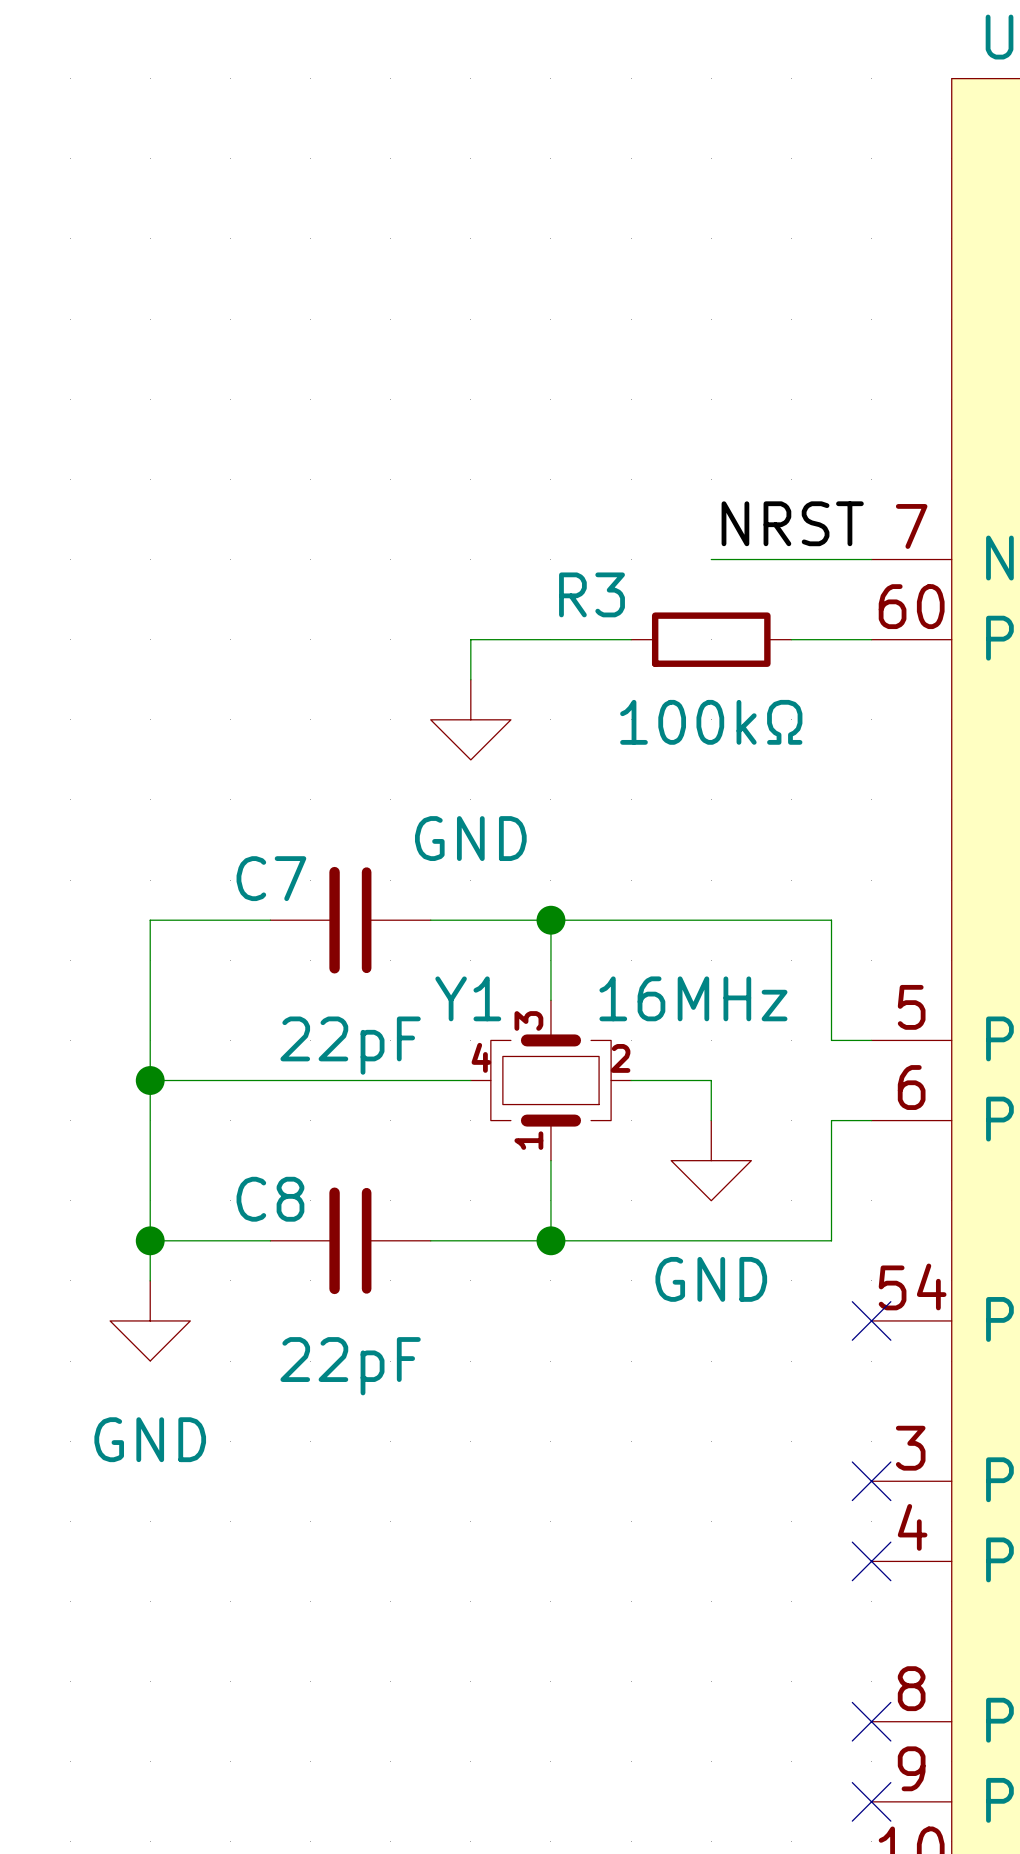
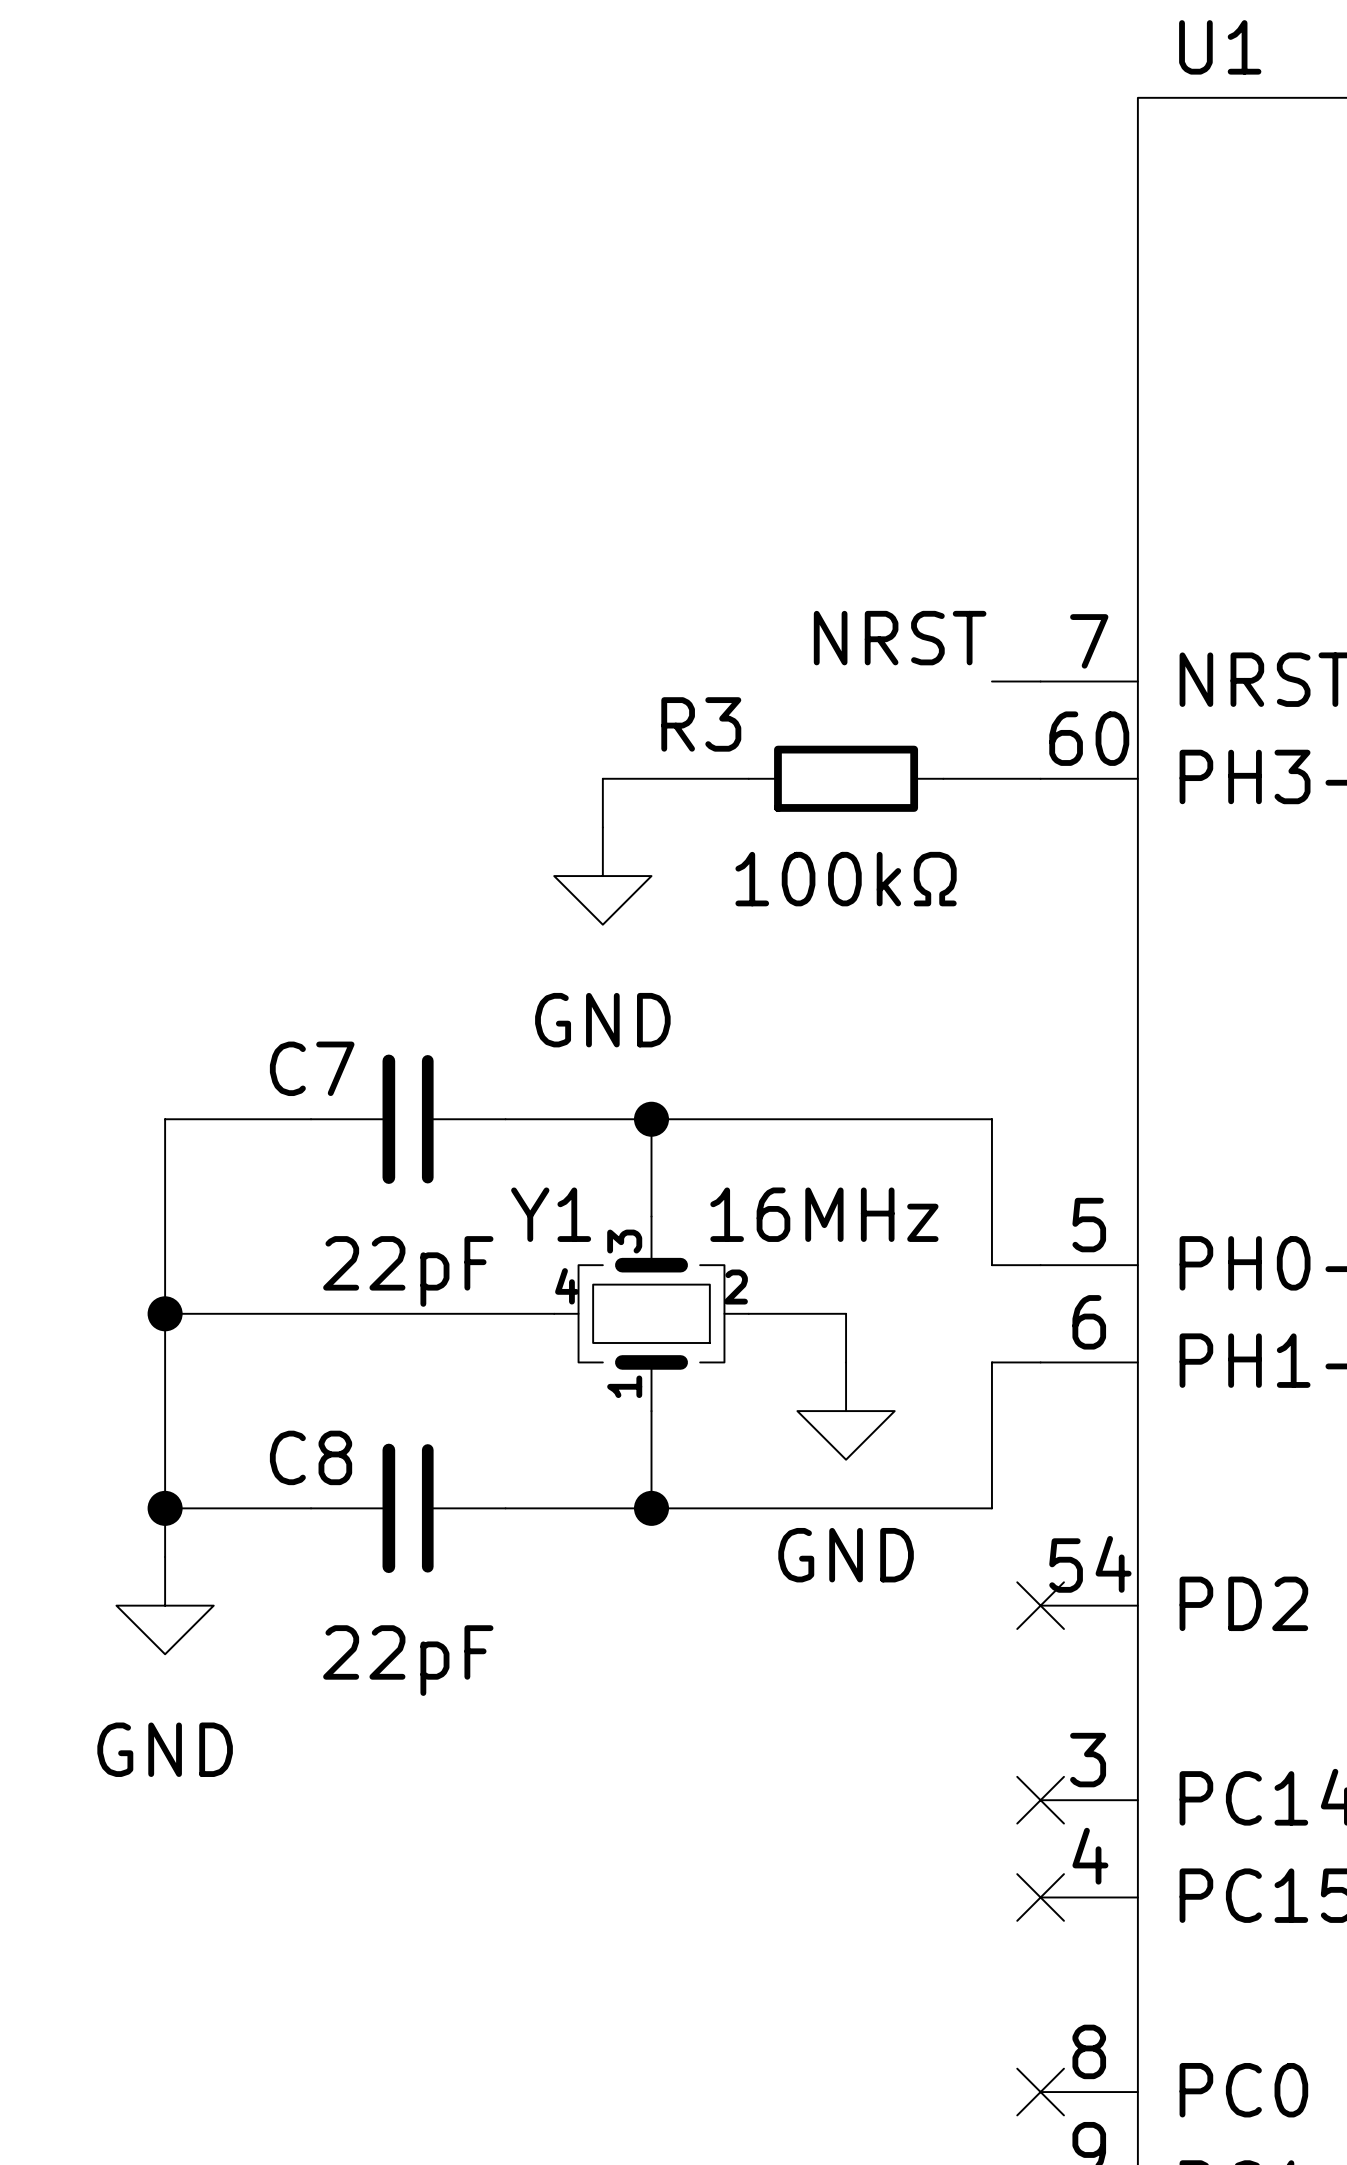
label position: NRST (792, 523) -> NRST (900, 638)
wire: (711, 559) (831, 559) -> none
wire: (510, 639) (470, 639) (470, 679) -> (602, 778) (602, 827)
power symbol position: GND (470, 719) -> GND (602, 876)

